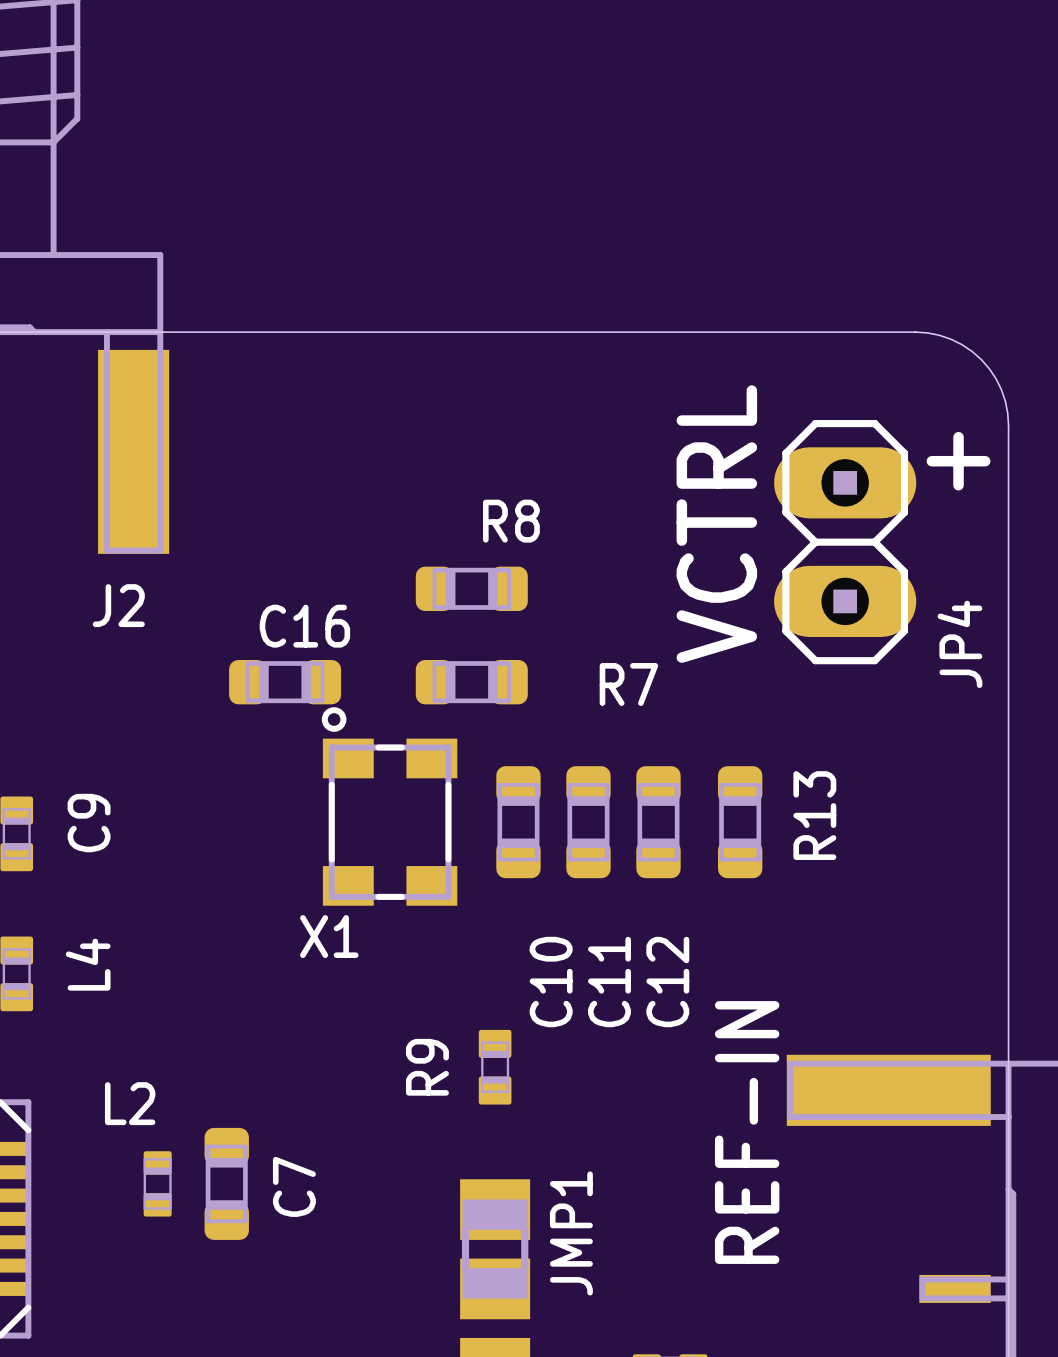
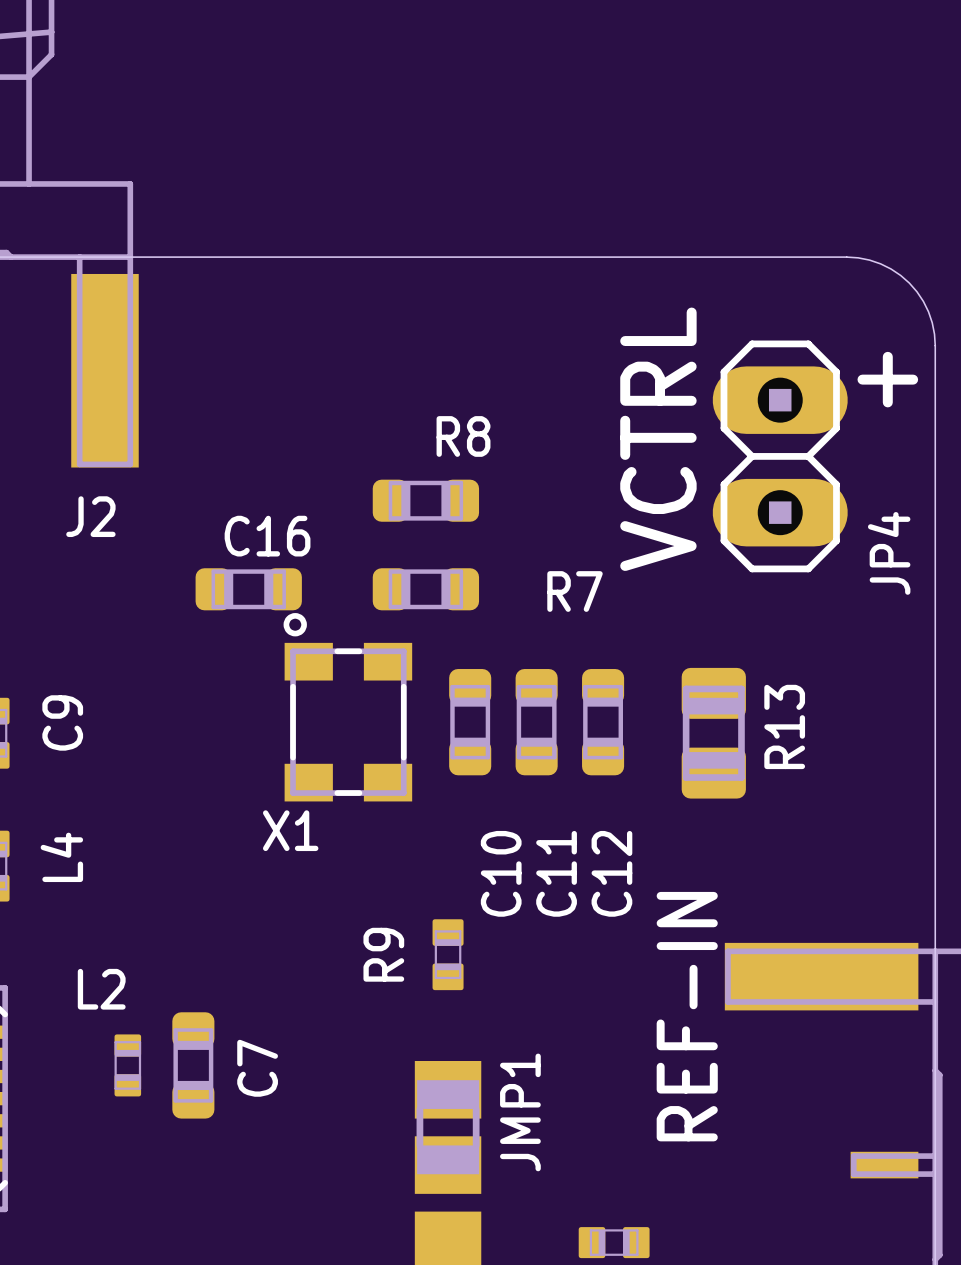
R13 footprint: [717, 766, 763, 879] -> [681, 667, 746, 799]

